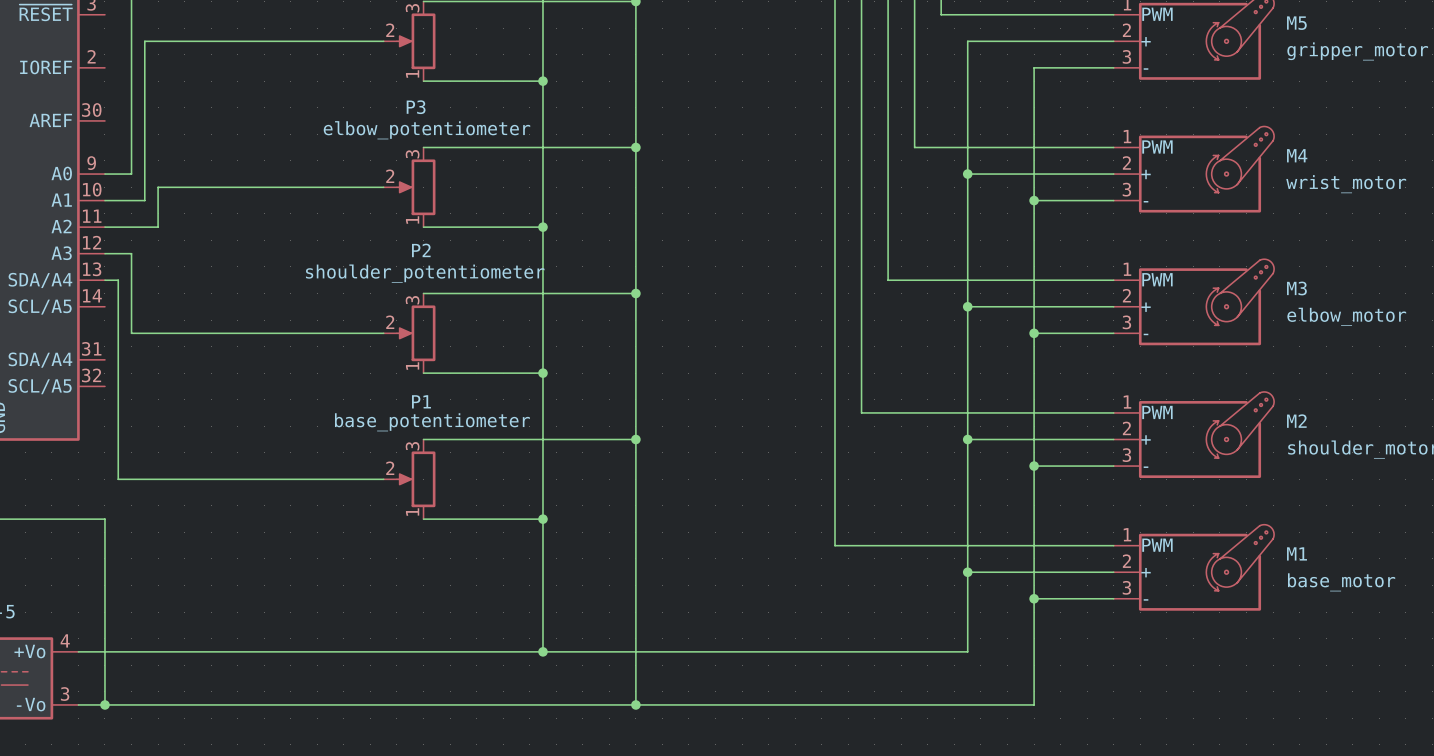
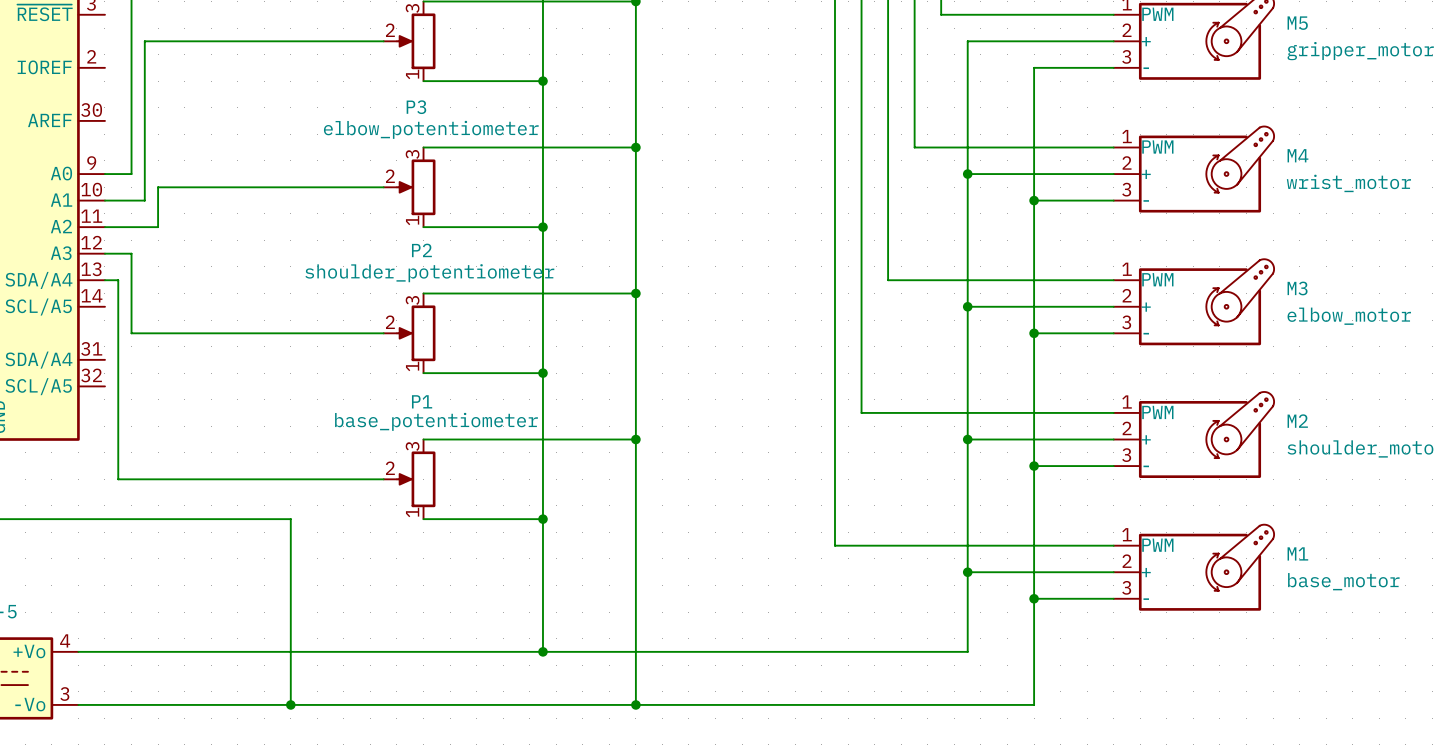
wire: (104, 519) (104, 704) -> (104, 519) (290, 519) (290, 704)
junction: (104, 704) -> none
junction: none -> (290, 704)

